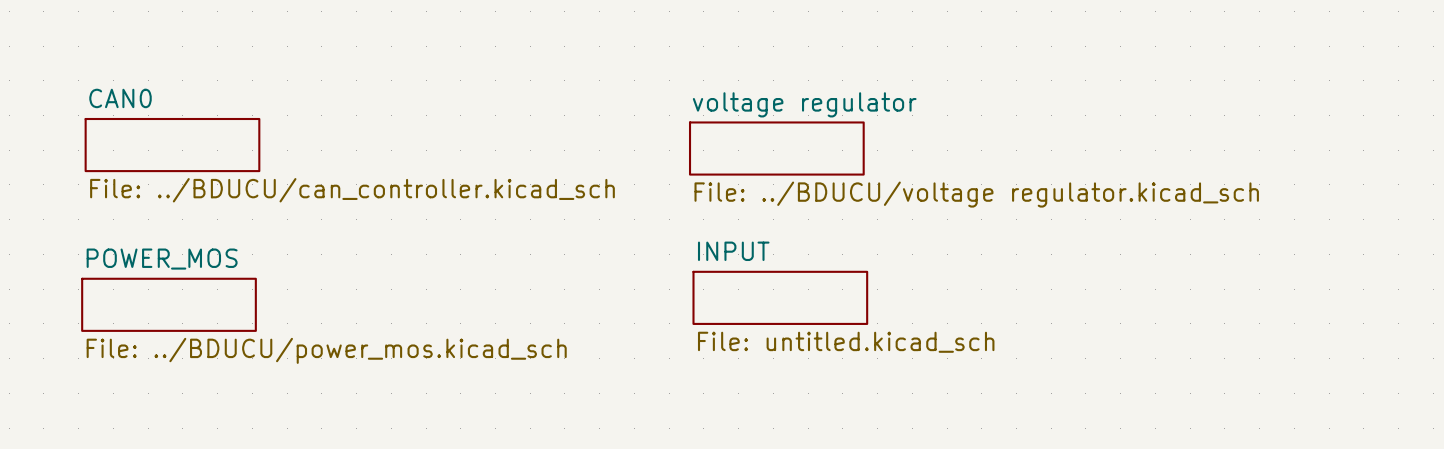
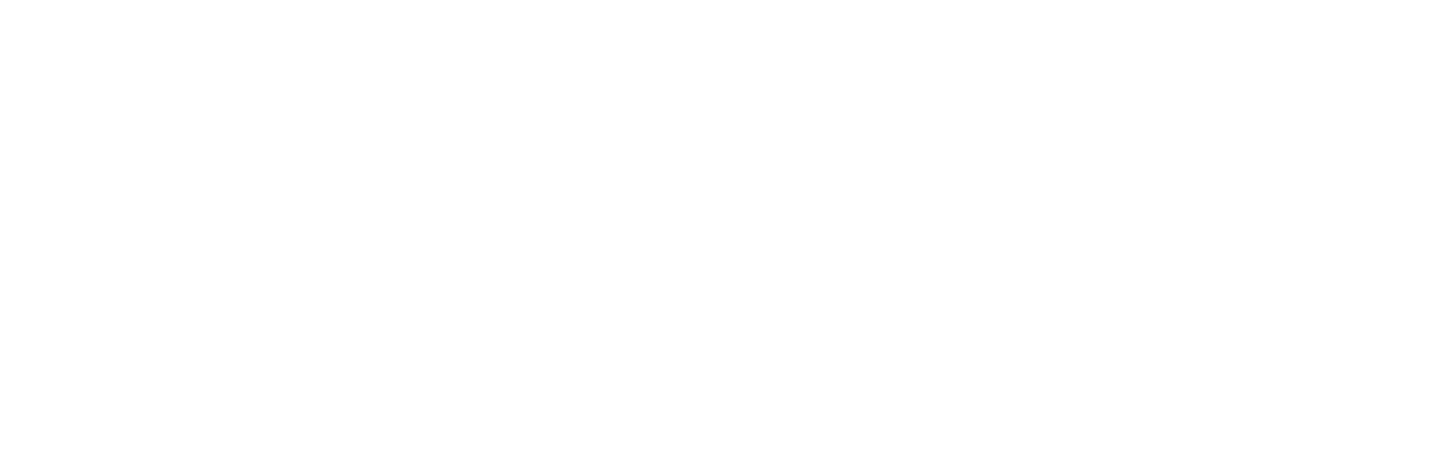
sheet CAN0: File: ../BDUCU/can_controller.kicad_sch (172, 145) -> none
sheet voltage regulator: File: ../BDUCU/voltage regulator.kicad_sch (776, 148) -> none
sheet INPUT: File: untitled.kicad_sch (780, 297) -> none
sheet POWER_MOS: File: ../BDUCU/power_mos.kicad_sch (169, 304) -> none

